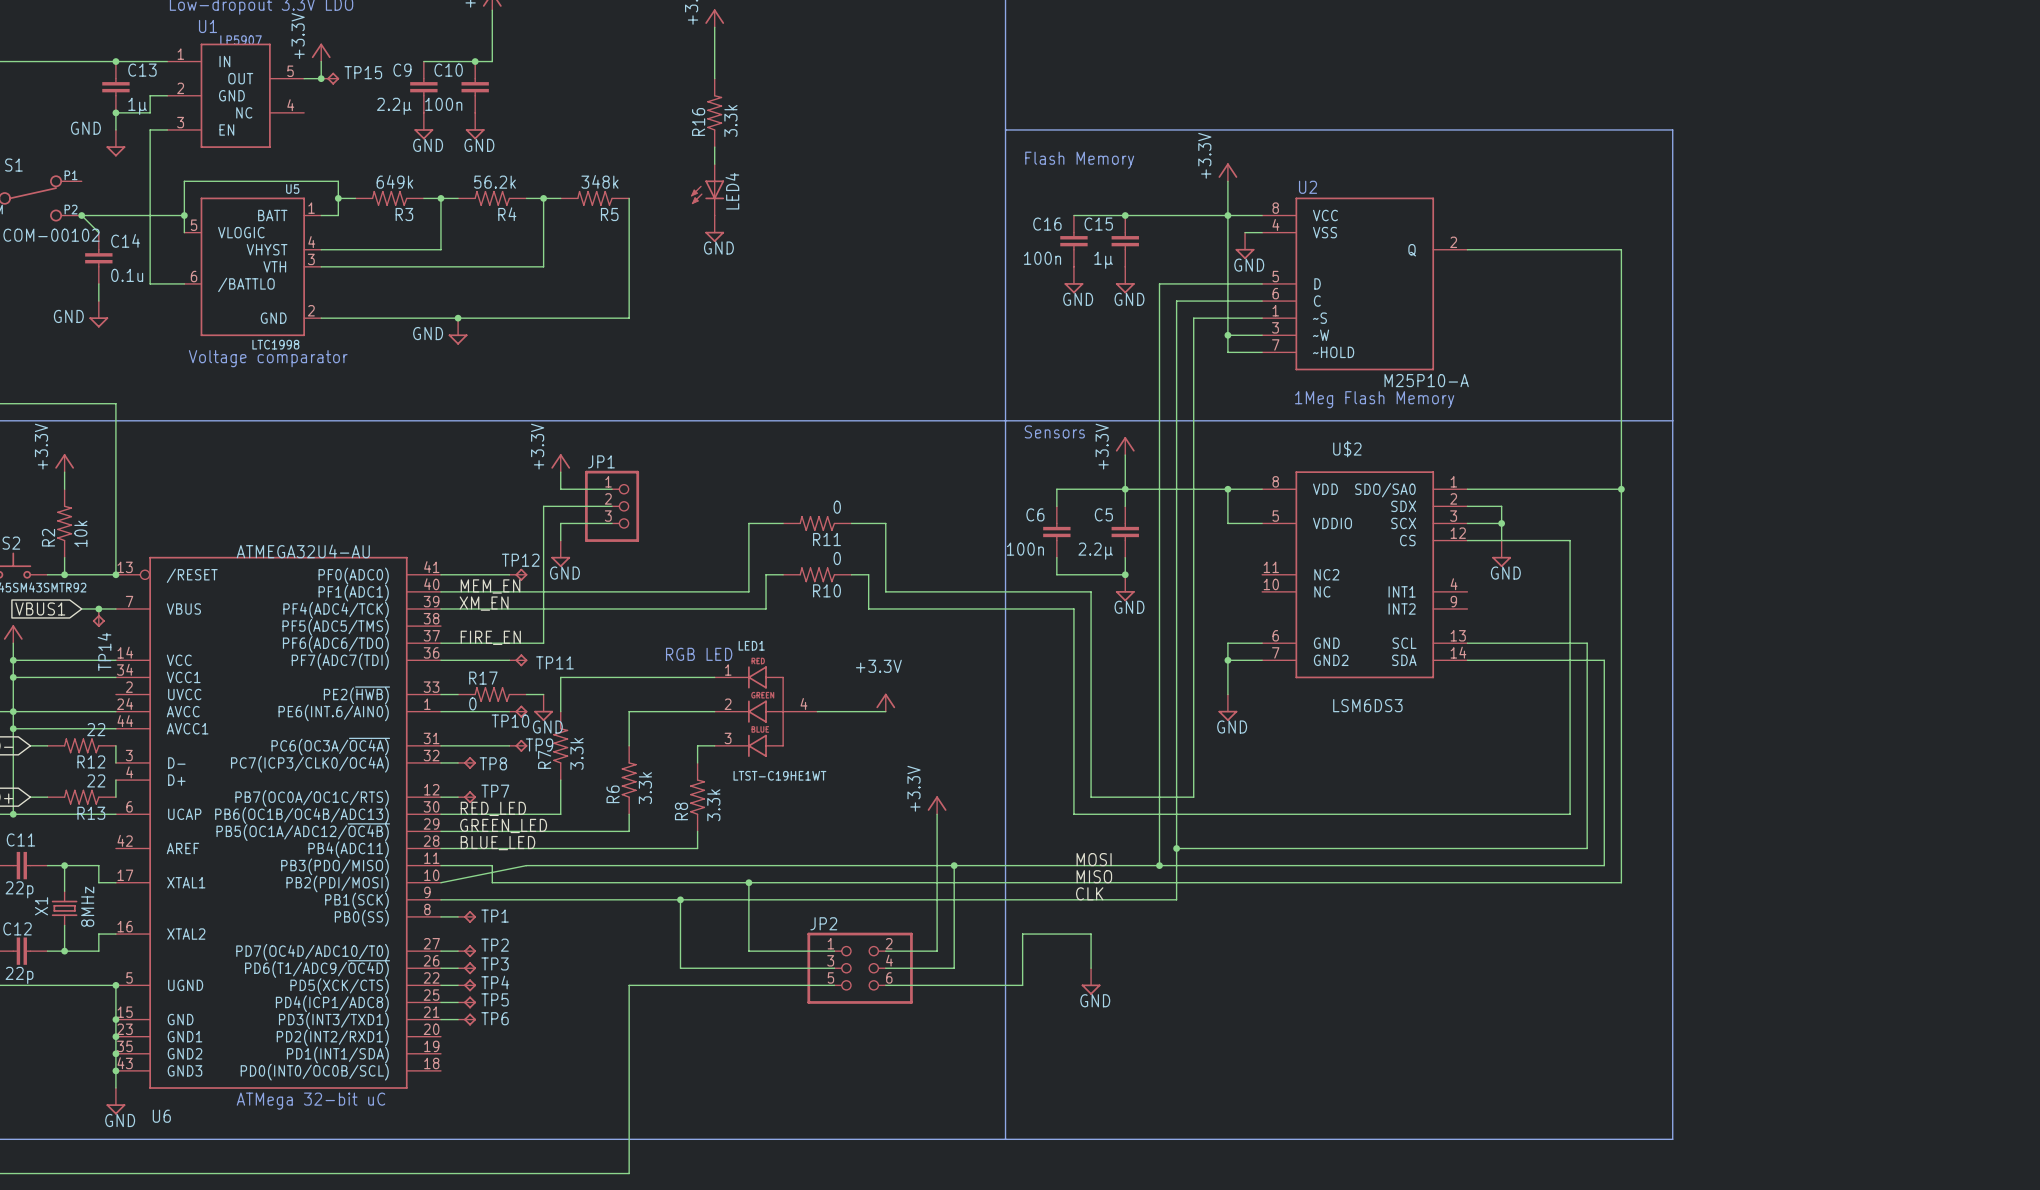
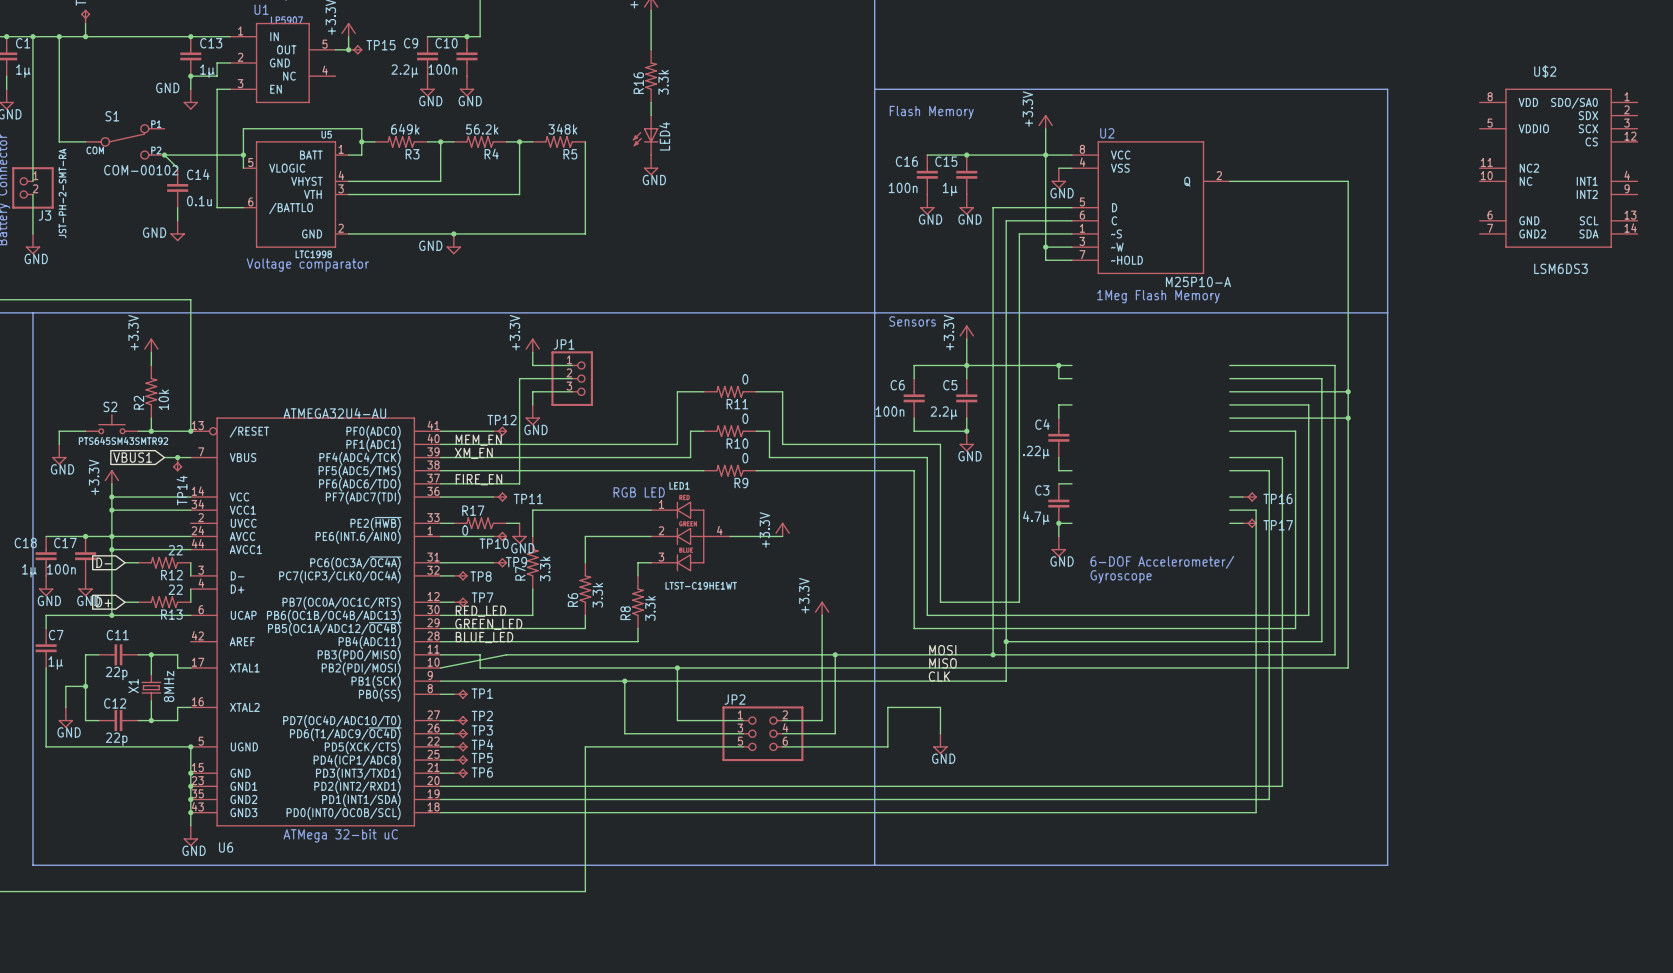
wire: (1227, 489) (1227, 523) (1262, 523) -> none
junction position: (1227, 489) -> (1058, 365)
wire: none -> (1058, 365) (1058, 378) (1071, 378)
wire: (1604, 489) (1621, 489) -> (1335, 365) (1335, 497)
junction: (1621, 489) -> none
wire: (1501, 506) (1501, 540) -> (1256, 378) (1321, 378) (1321, 483)
junction: (1501, 523) -> none
junction: none -> (1348, 391)
wire: none -> (1071, 404) (1058, 404) (1058, 418)
power symbol: GND (1501, 553) -> none
wire: none -> (1229, 418) (1348, 418)
junction: none -> (1348, 418)
U$2 position: (1364, 574) -> (1558, 168)
wire: none -> (1229, 431) (1295, 431) (1295, 628) (914, 628) (914, 470) (756, 470)
C4: none -> .22µ (1058, 437)
wire: none -> (1058, 457) (1058, 470) (1071, 470)
wire: none -> (1229, 457) (1282, 457) (1282, 786) (440, 786)
wire: none -> (440, 470) (703, 470)
R9: none -> 0 (730, 470)
wire: none -> (1229, 470) (1269, 470) (1269, 799) (440, 799)
wire: (1245, 643) (1227, 643) (1227, 694) -> none
wire: (1467, 643) (1587, 643) -> (1256, 391) (1348, 391)
wire: (1227, 660) (1262, 660) -> none
junction position: (1227, 660) -> (1058, 523)
wire: (1484, 660) (1604, 660) -> none
TP16: none -> (1249, 497)
power symbol text rotation: 0° (878, 666) -> 90° counterclockwise (764, 529)
C3: none -> 4.7µ (1058, 503)
wire: none -> (1229, 510) (1256, 510) (1256, 812) (440, 812)
wire: none -> (1071, 523) (1058, 523) (1058, 536)
wire: none -> (1229, 523) (1242, 523)
TP17: none -> (1249, 523)
power symbol position: GND (1227, 707) -> GND (1058, 546)
text: none -> 6-DOF Accelerometer/ (1162, 562)
text: none -> Gyroscope (1121, 576)

